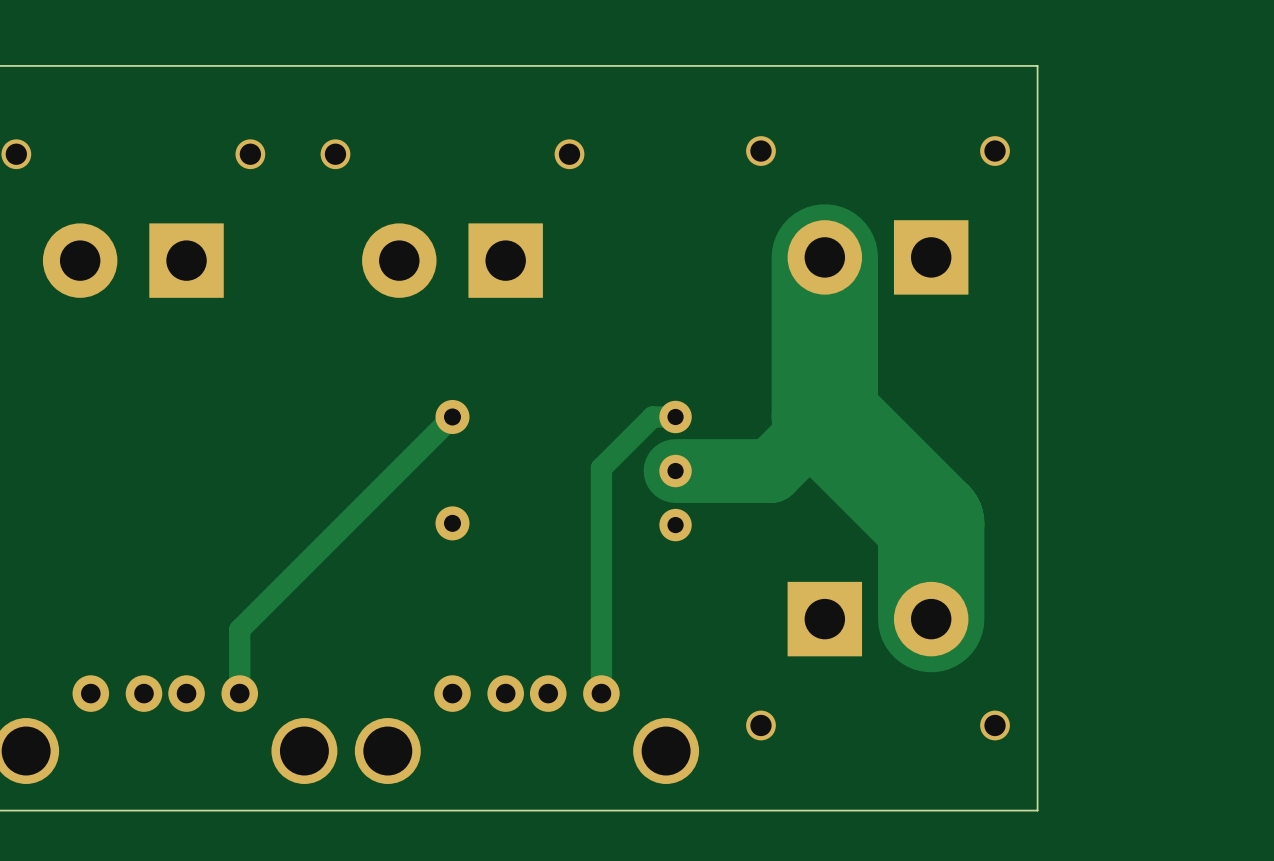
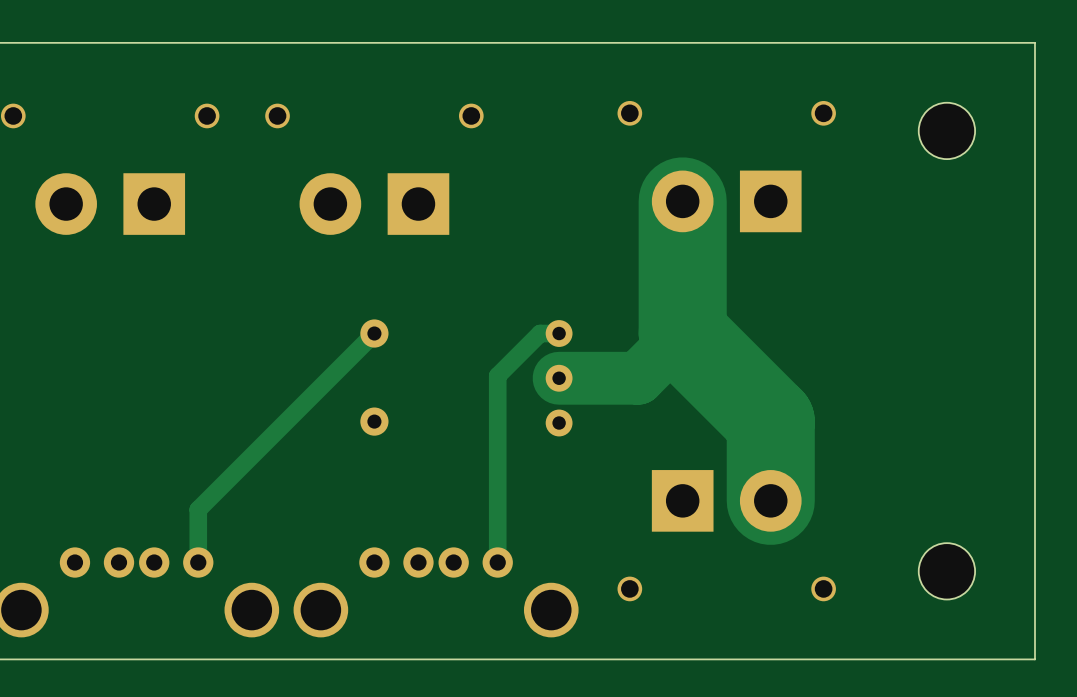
board edge: (1037, 65) (1037, 810) -> (858, 42) (1034, 42) (1034, 659) (858, 659)
part: none -> (946, 130)
part: none -> (946, 571)

